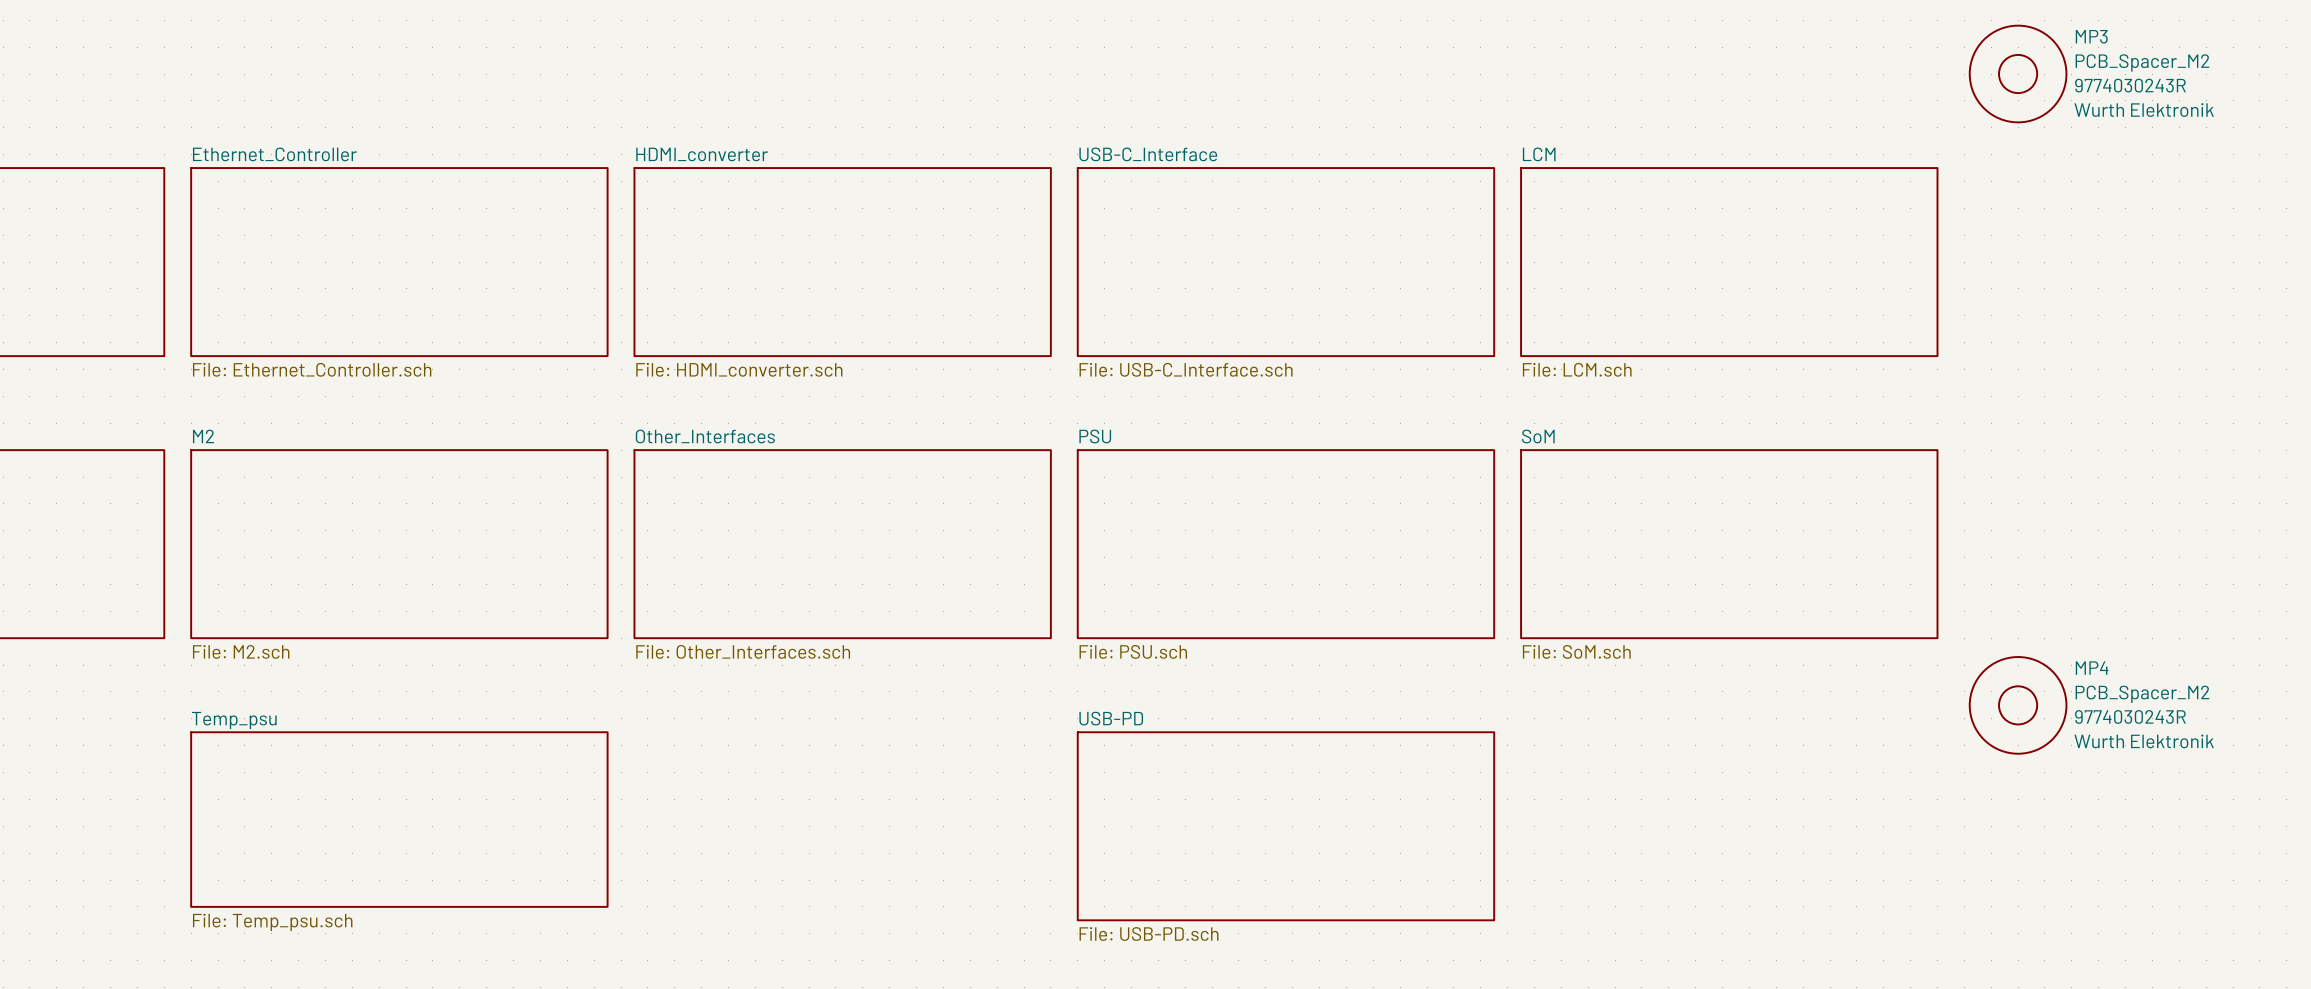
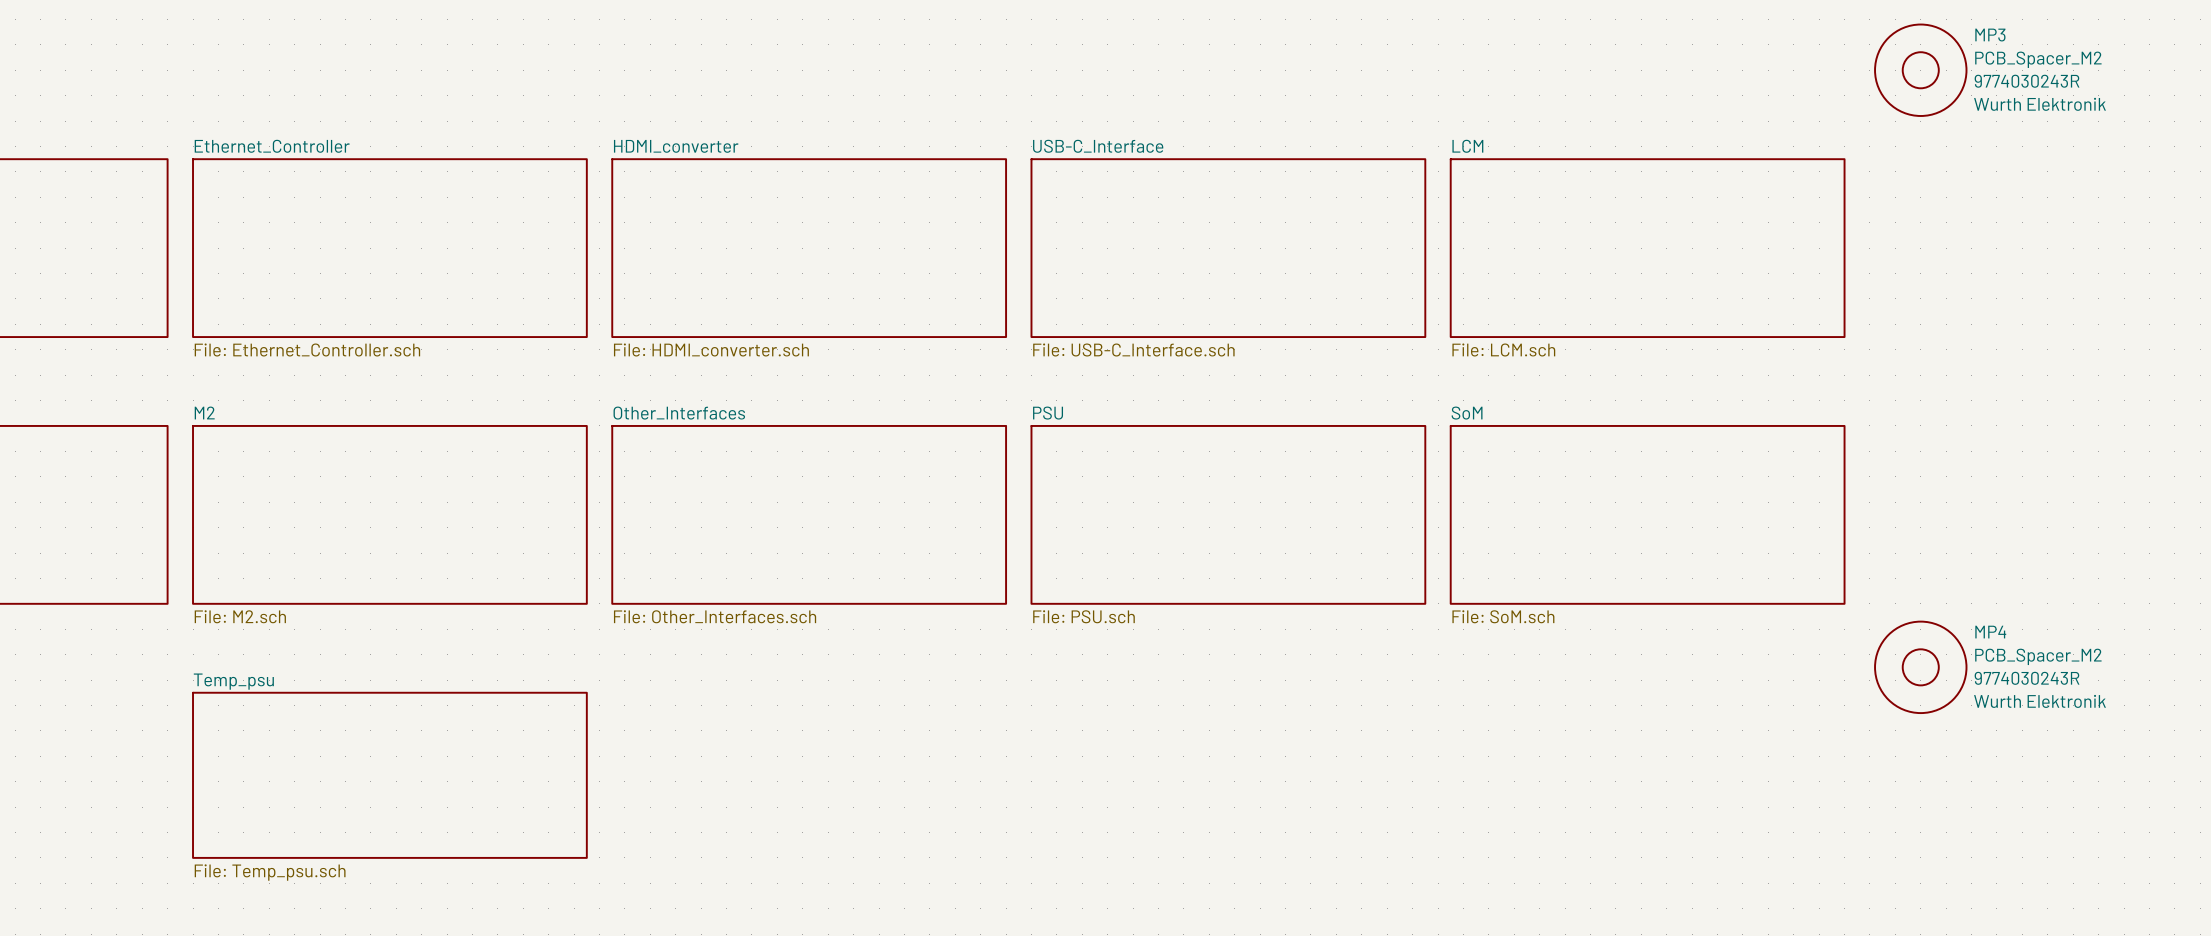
sheet USB-PD: File: USB-PD.sch (1285, 826) -> none

